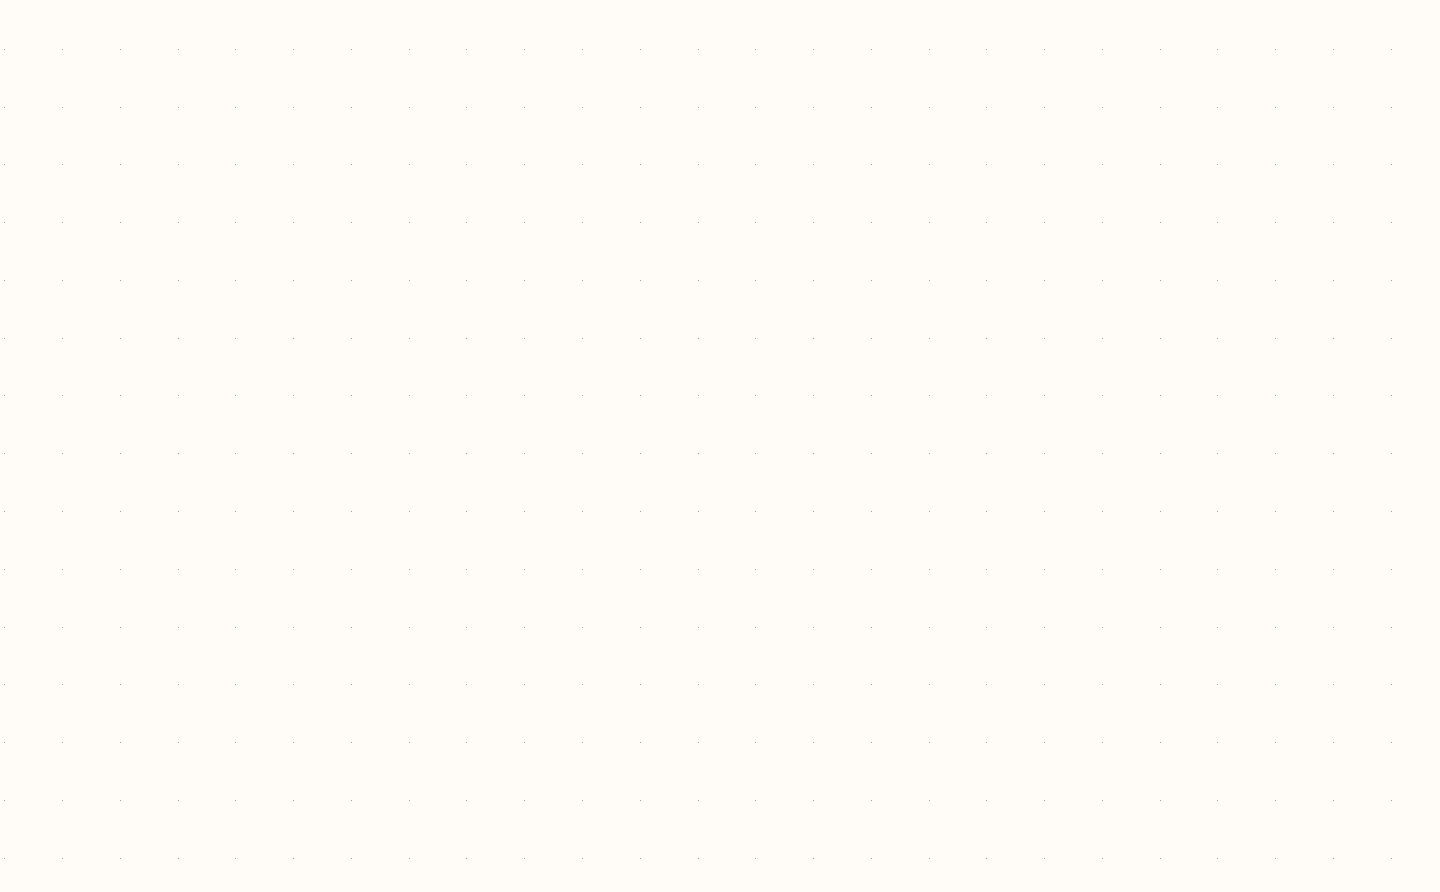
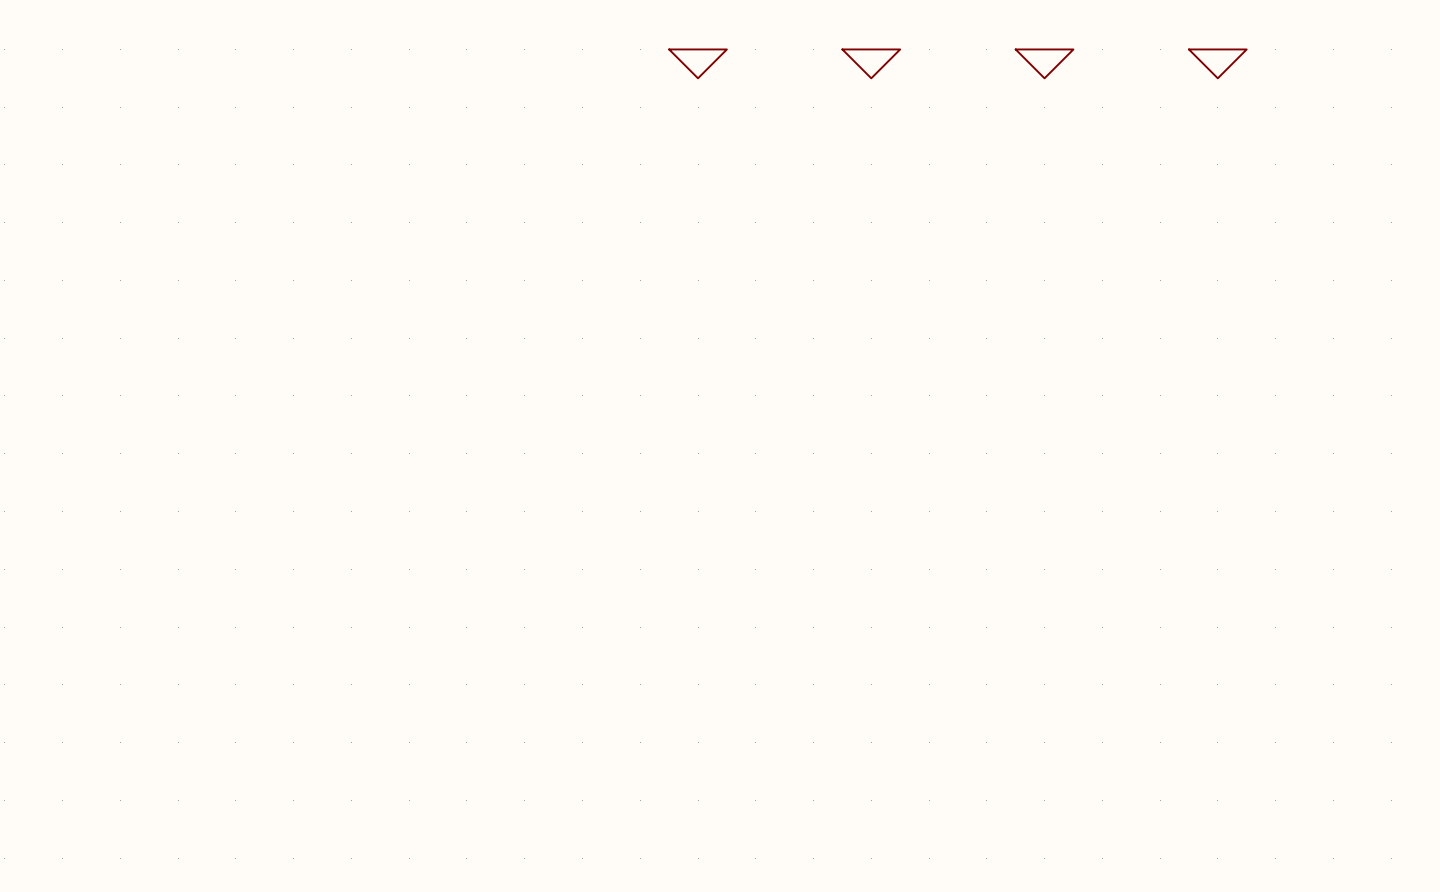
power symbol: none -> (698, 63)
power symbol: none -> (871, 63)
power symbol: none -> (1044, 63)
power symbol: none -> (1217, 63)

